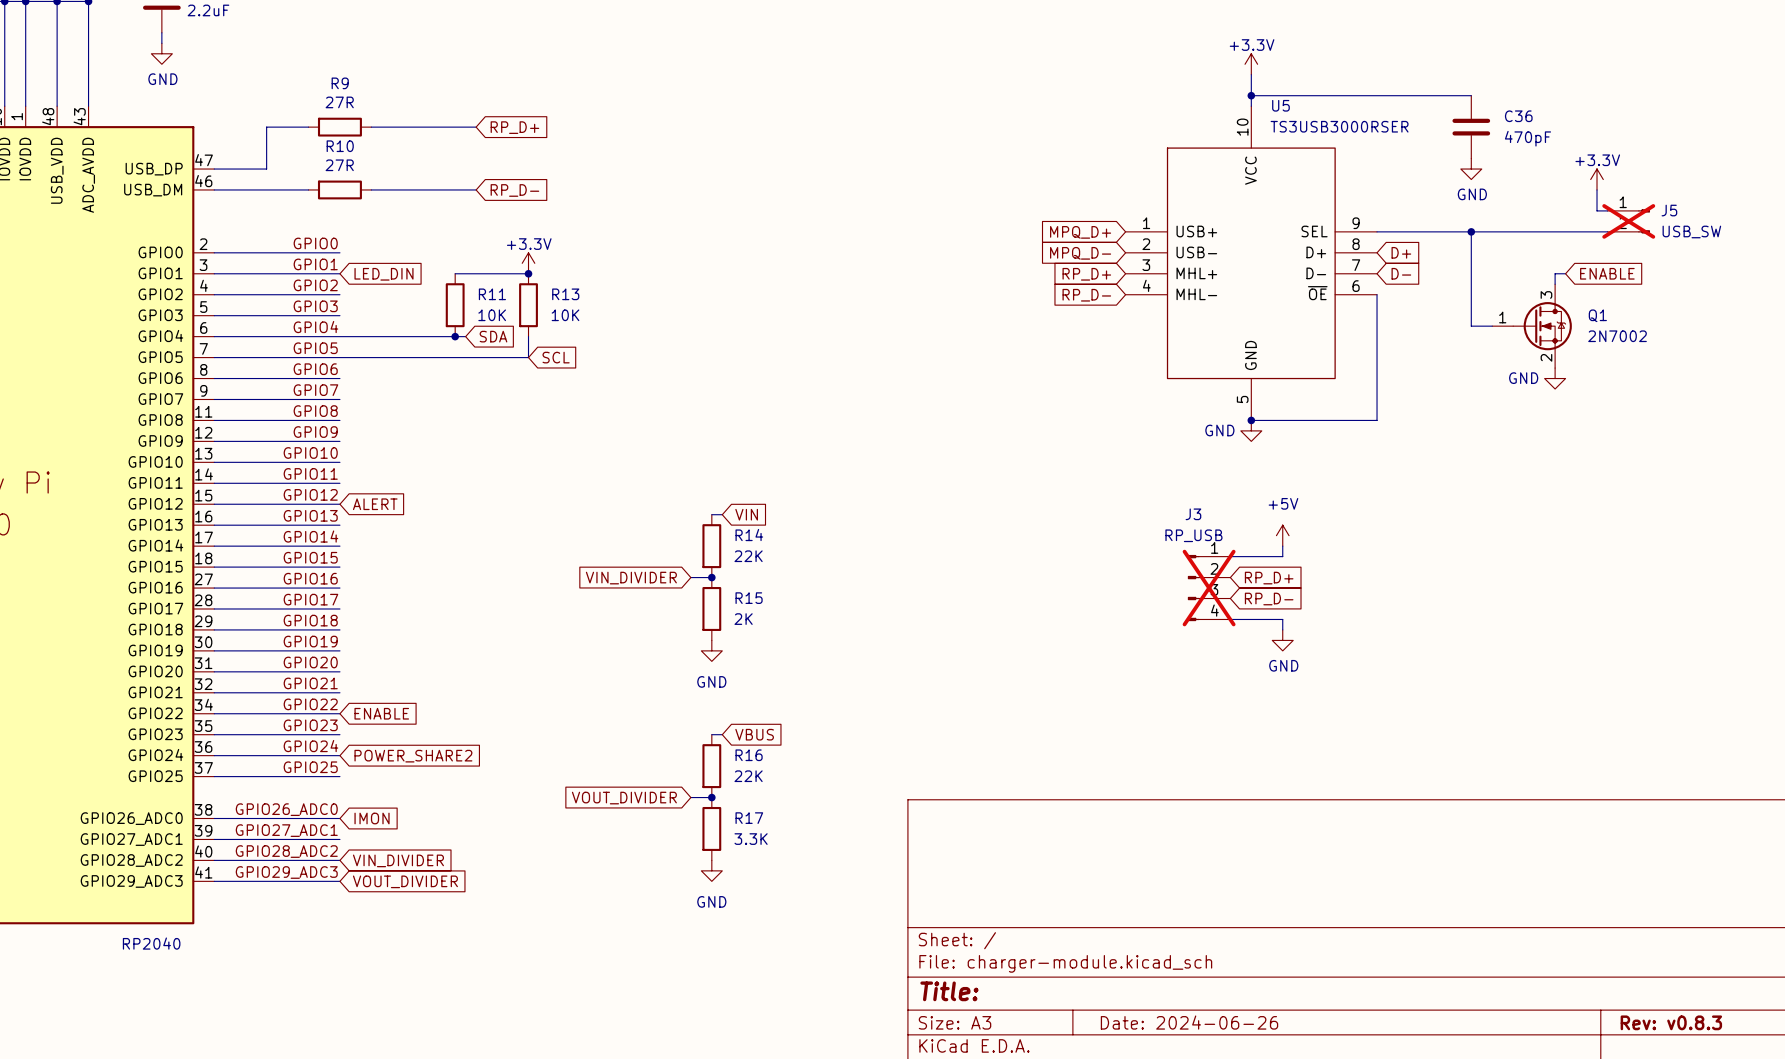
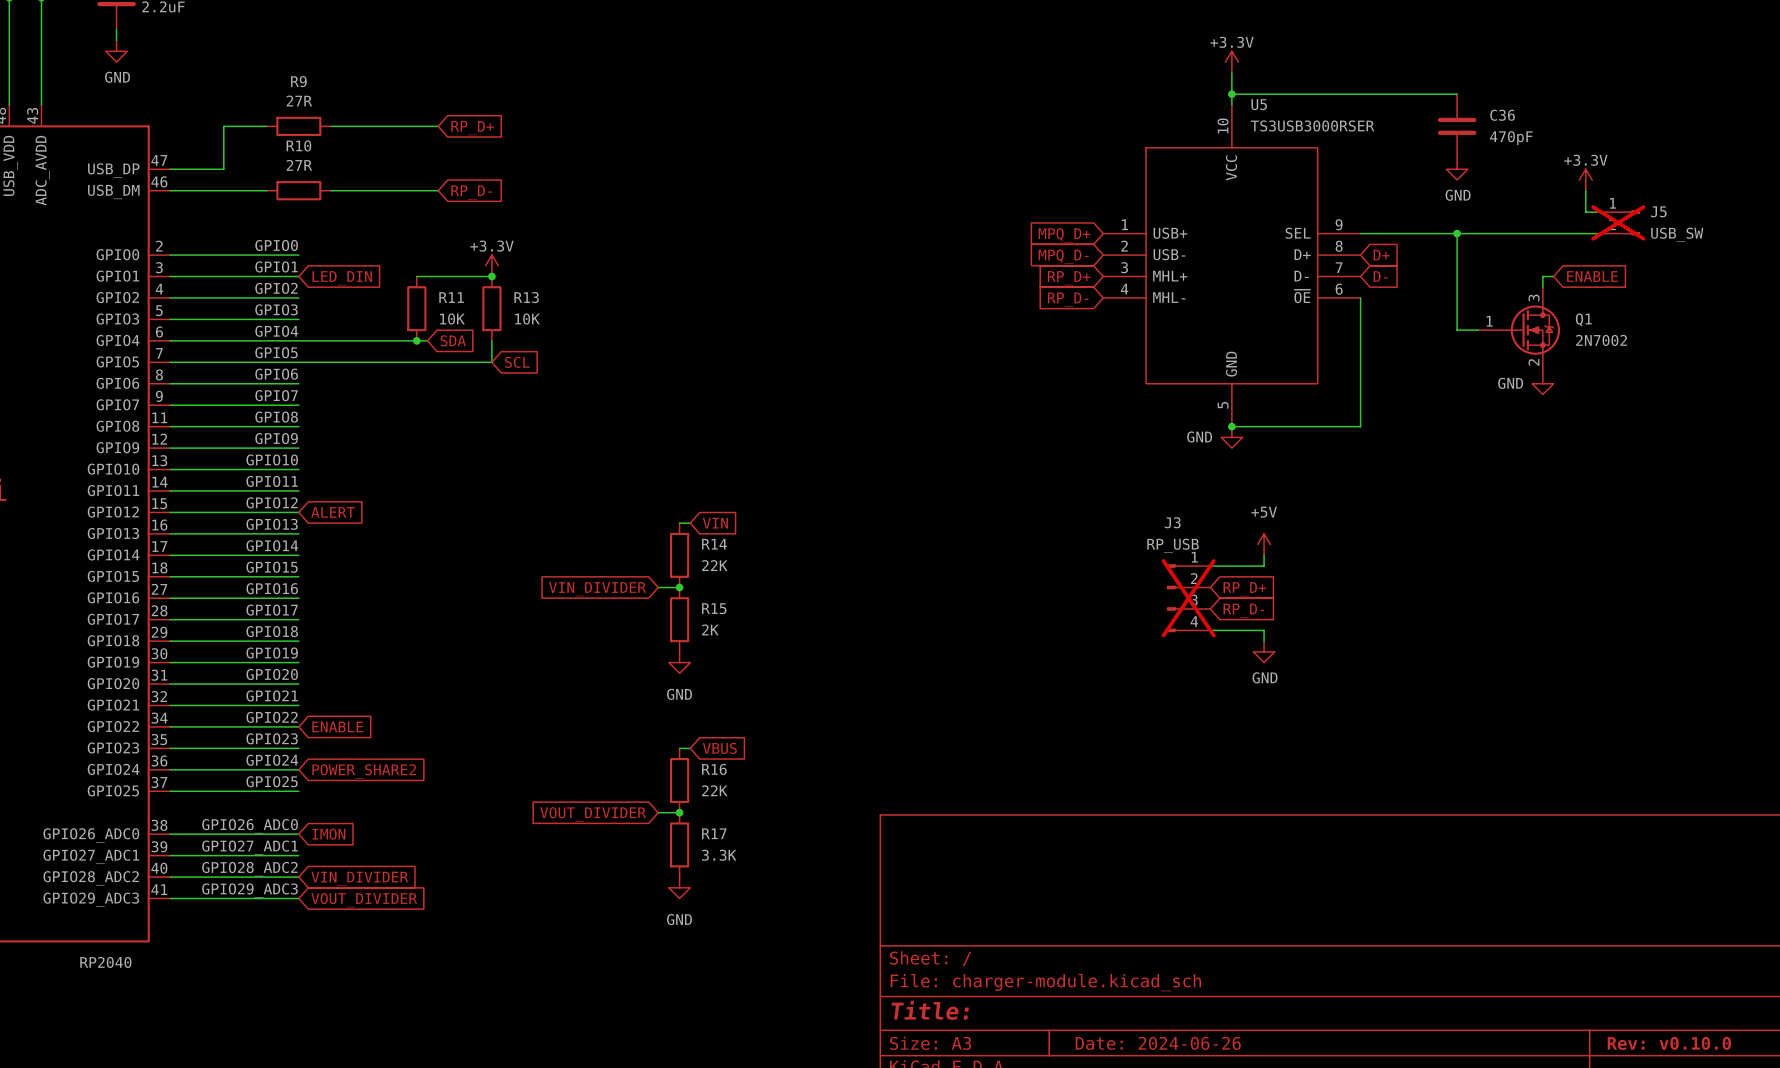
title block: Rev: v0.8.3 (1671, 1022) -> Rev: v0.10.0 (1669, 1043)

